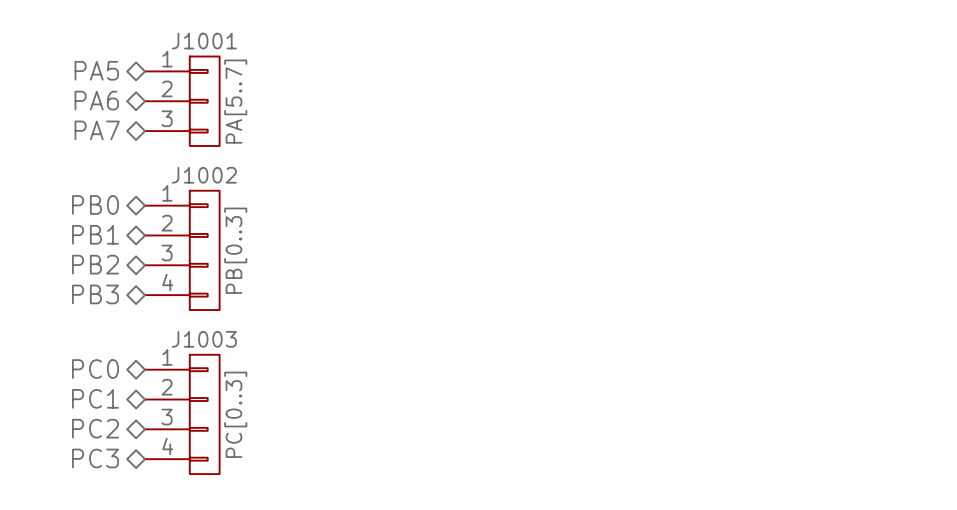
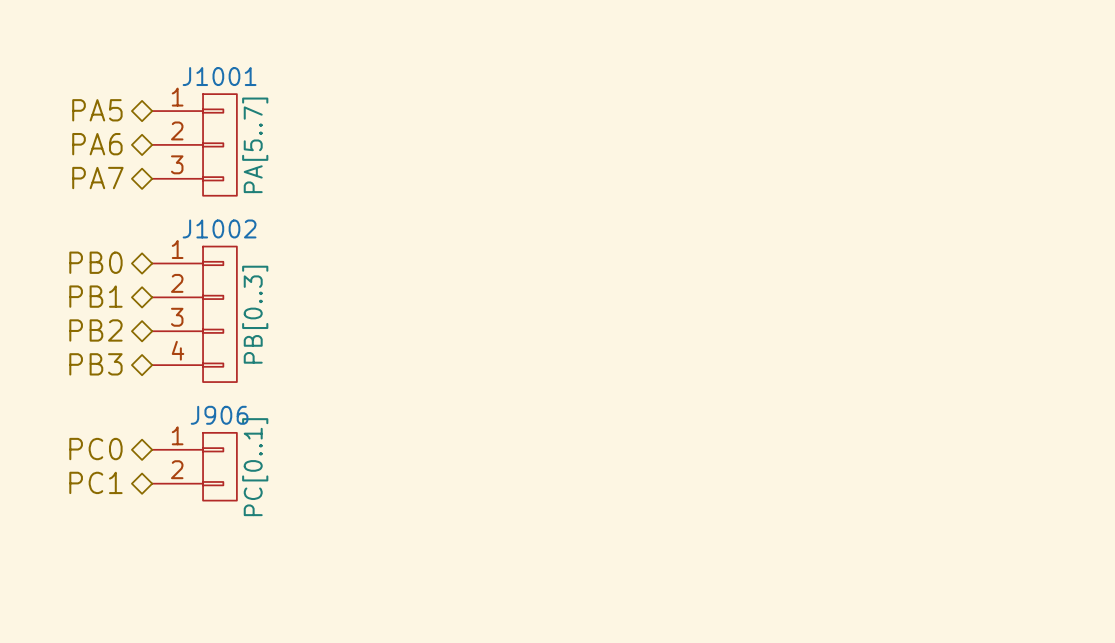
J906: none -> PC[0..1] (194, 466)
J1003: PC[0..3] (182, 414) -> none
hierarchical label: PC2 (95, 428) -> none
hierarchical label: PC3 (95, 458) -> none

